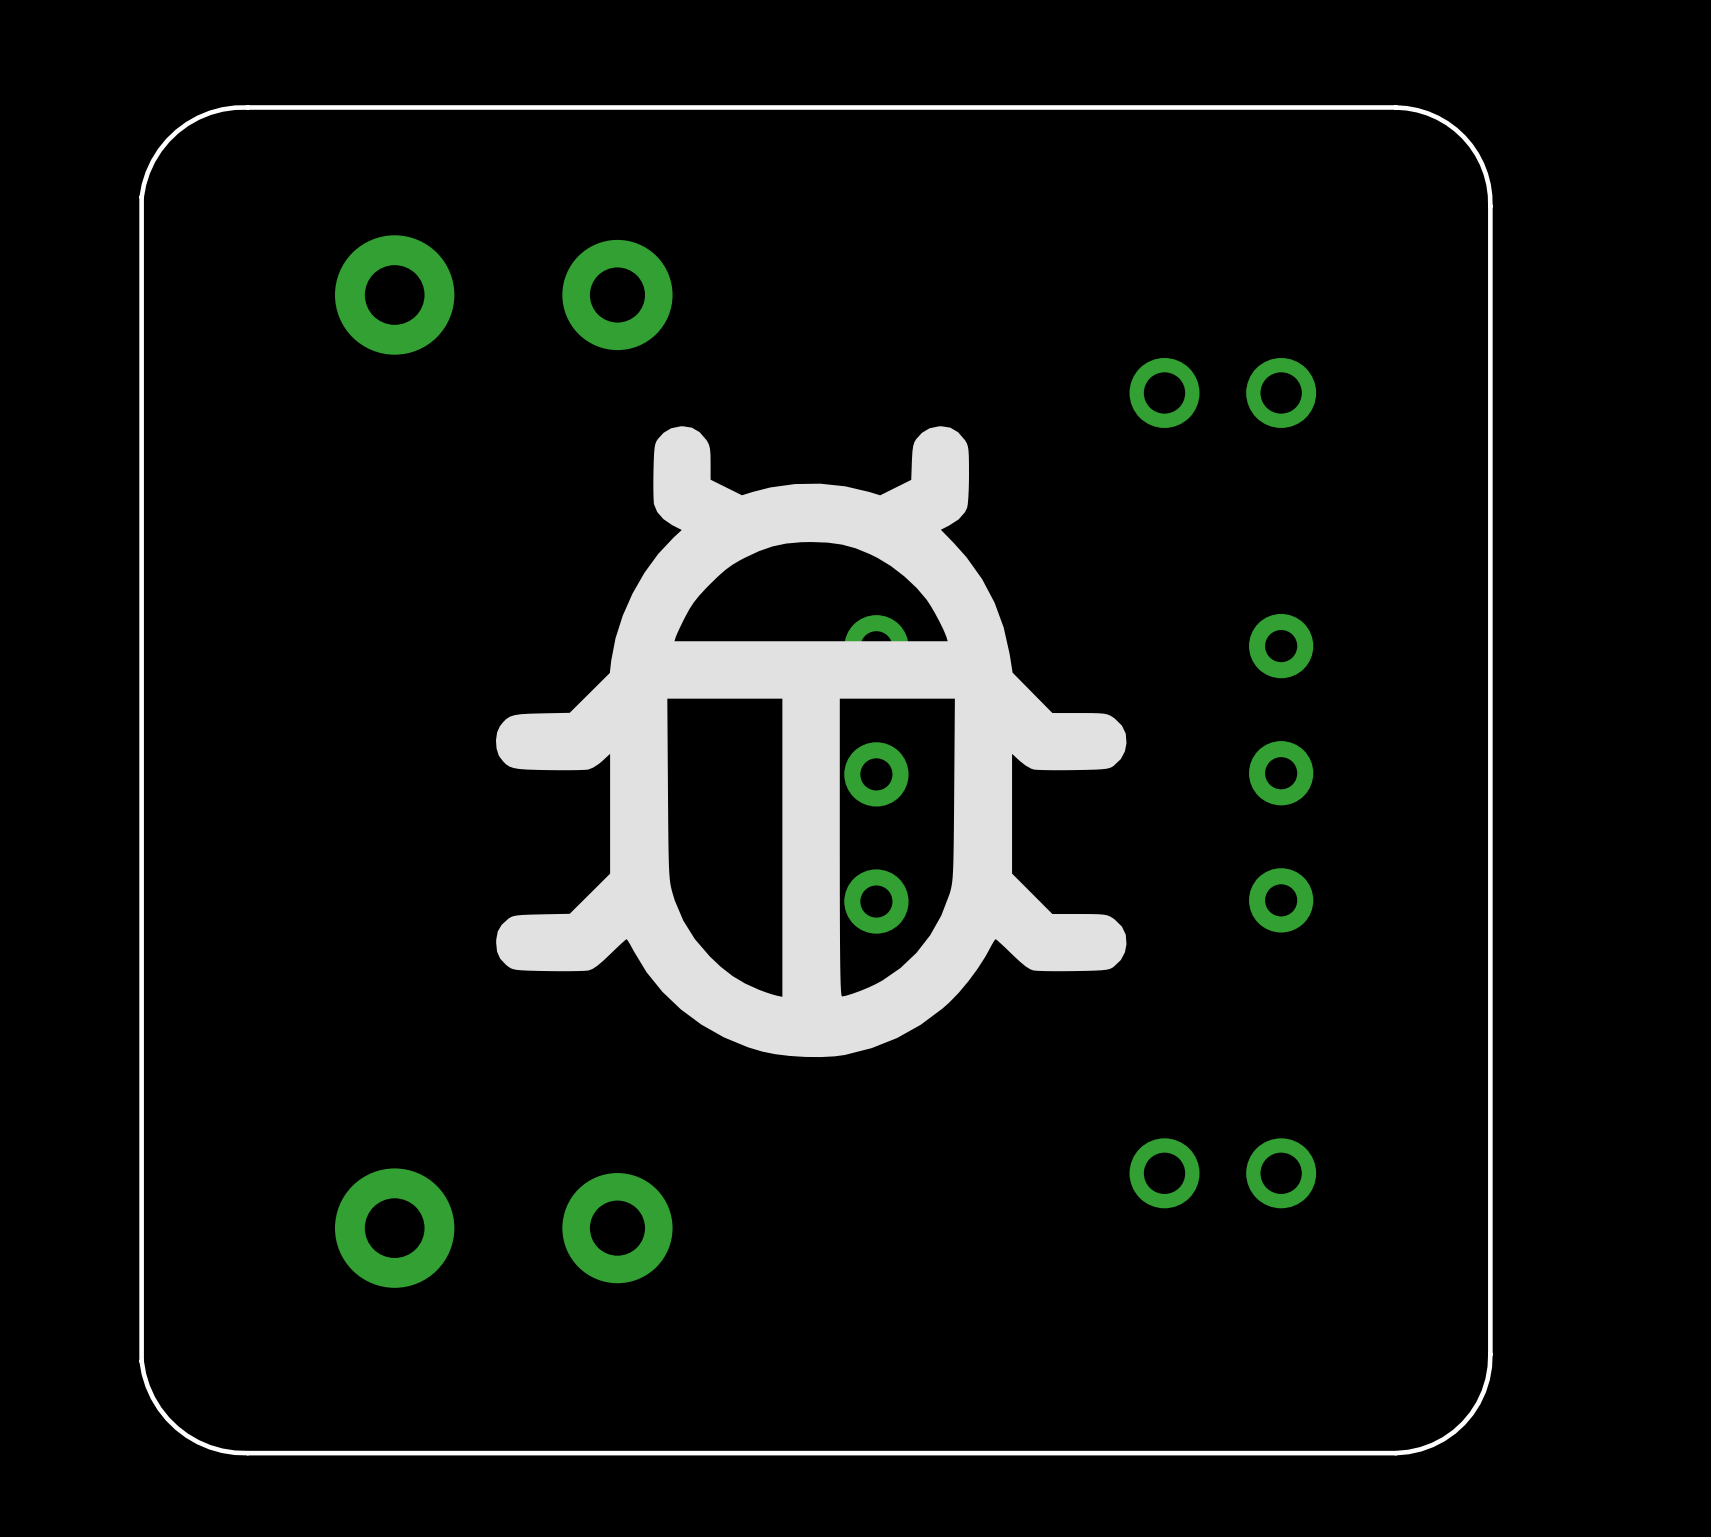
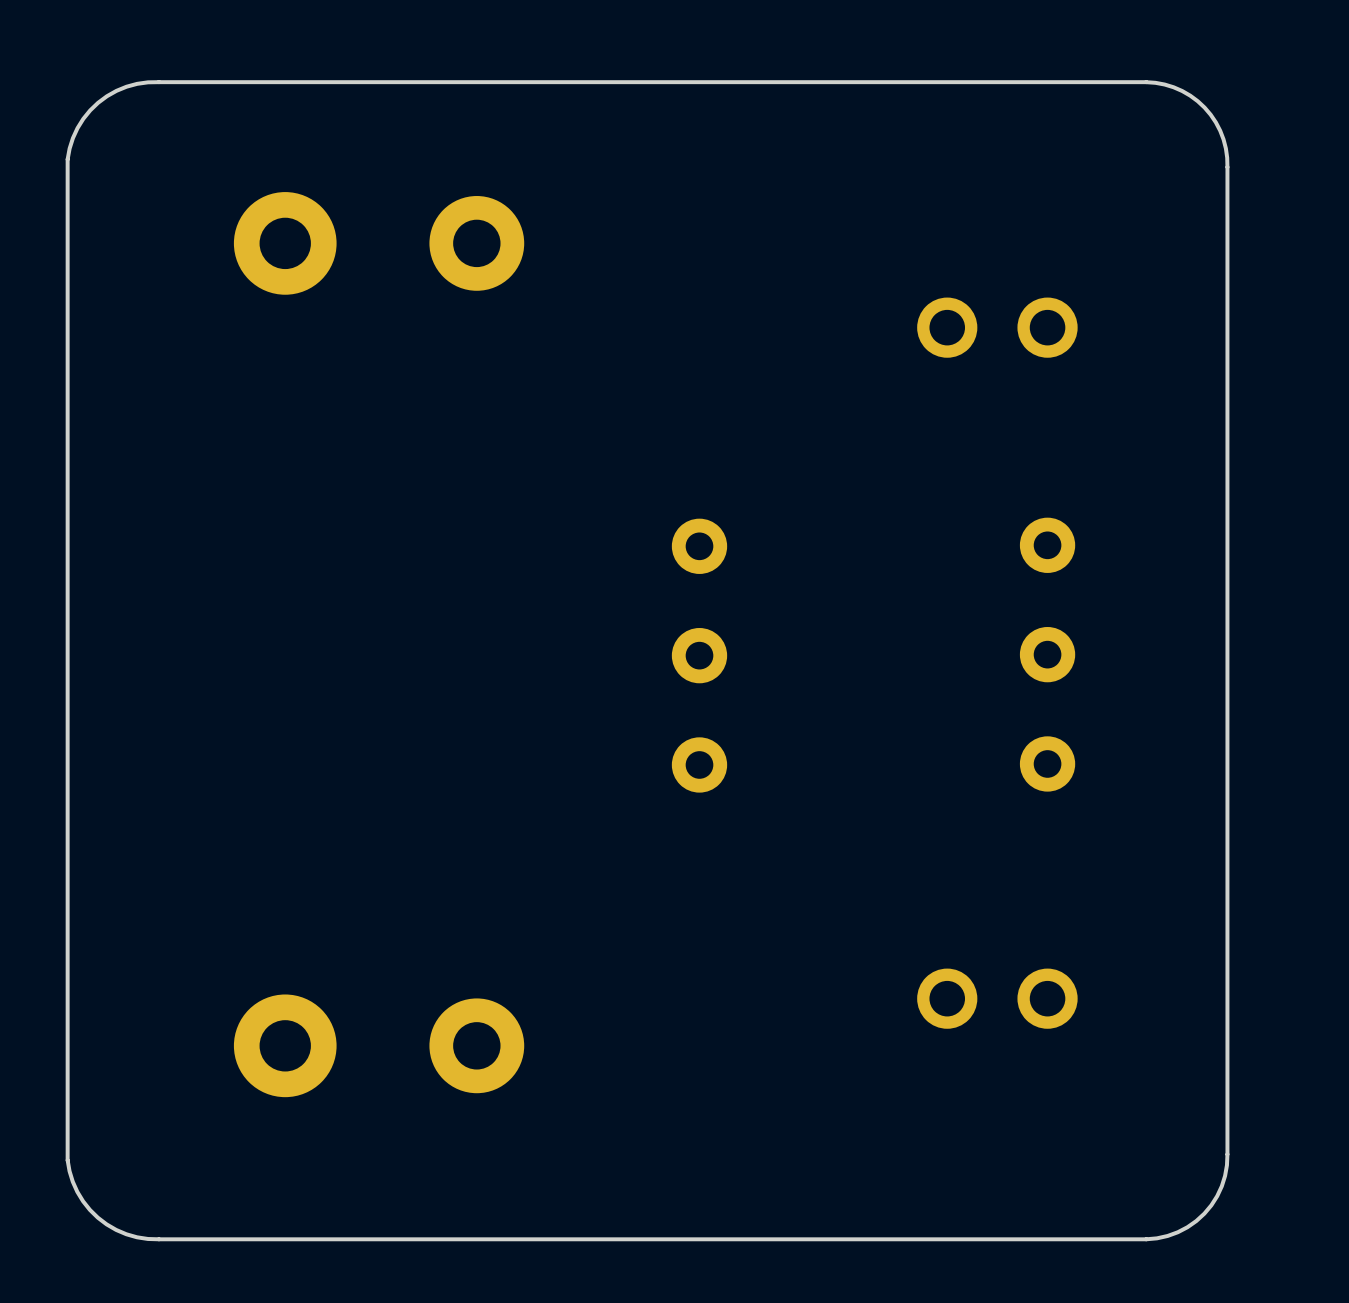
drawing: [495, 426, 1127, 1058] -> none

